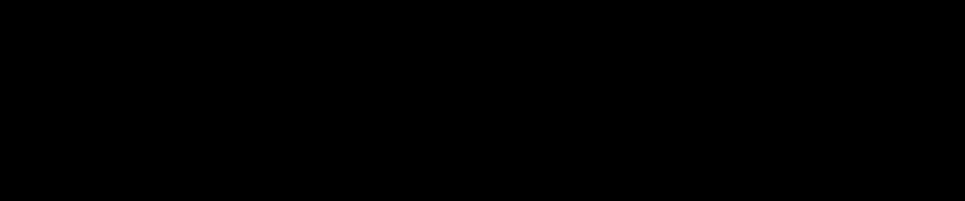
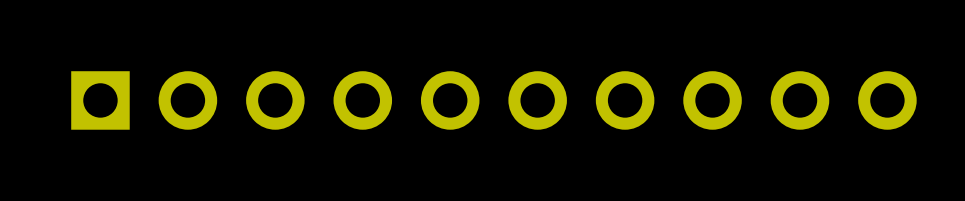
part: none -> (493, 100)

